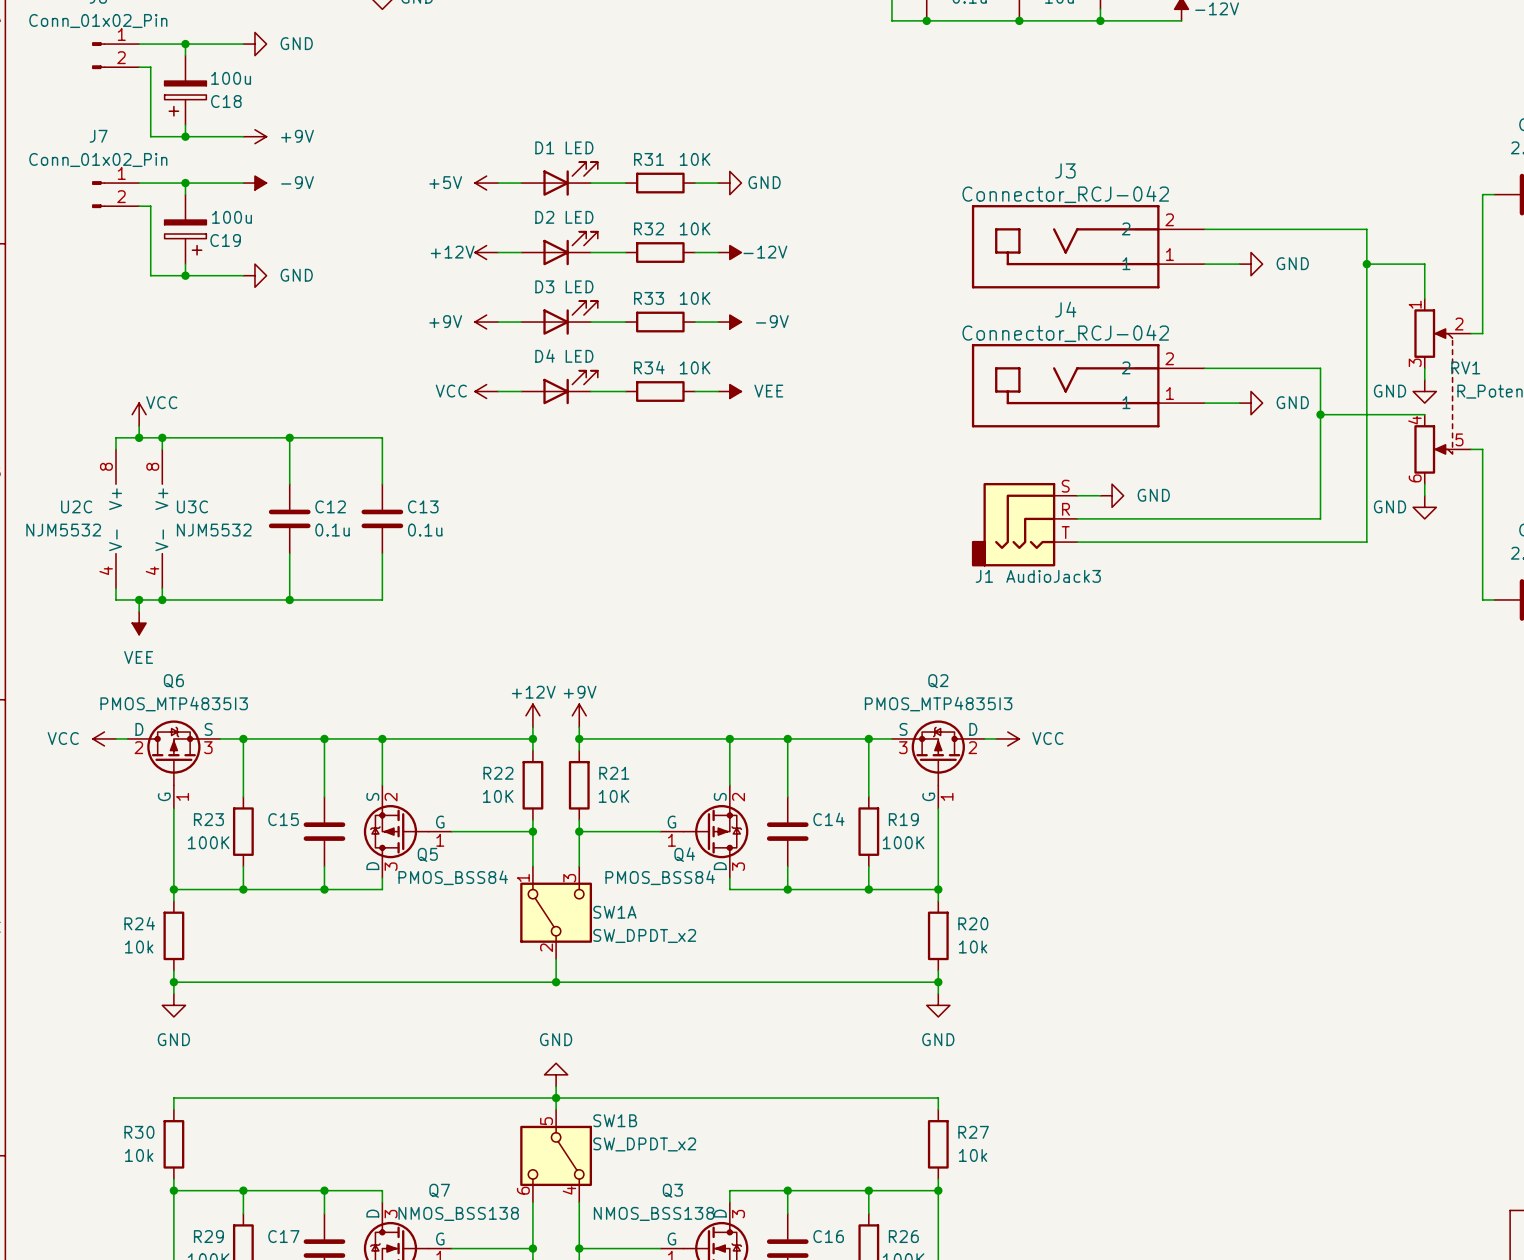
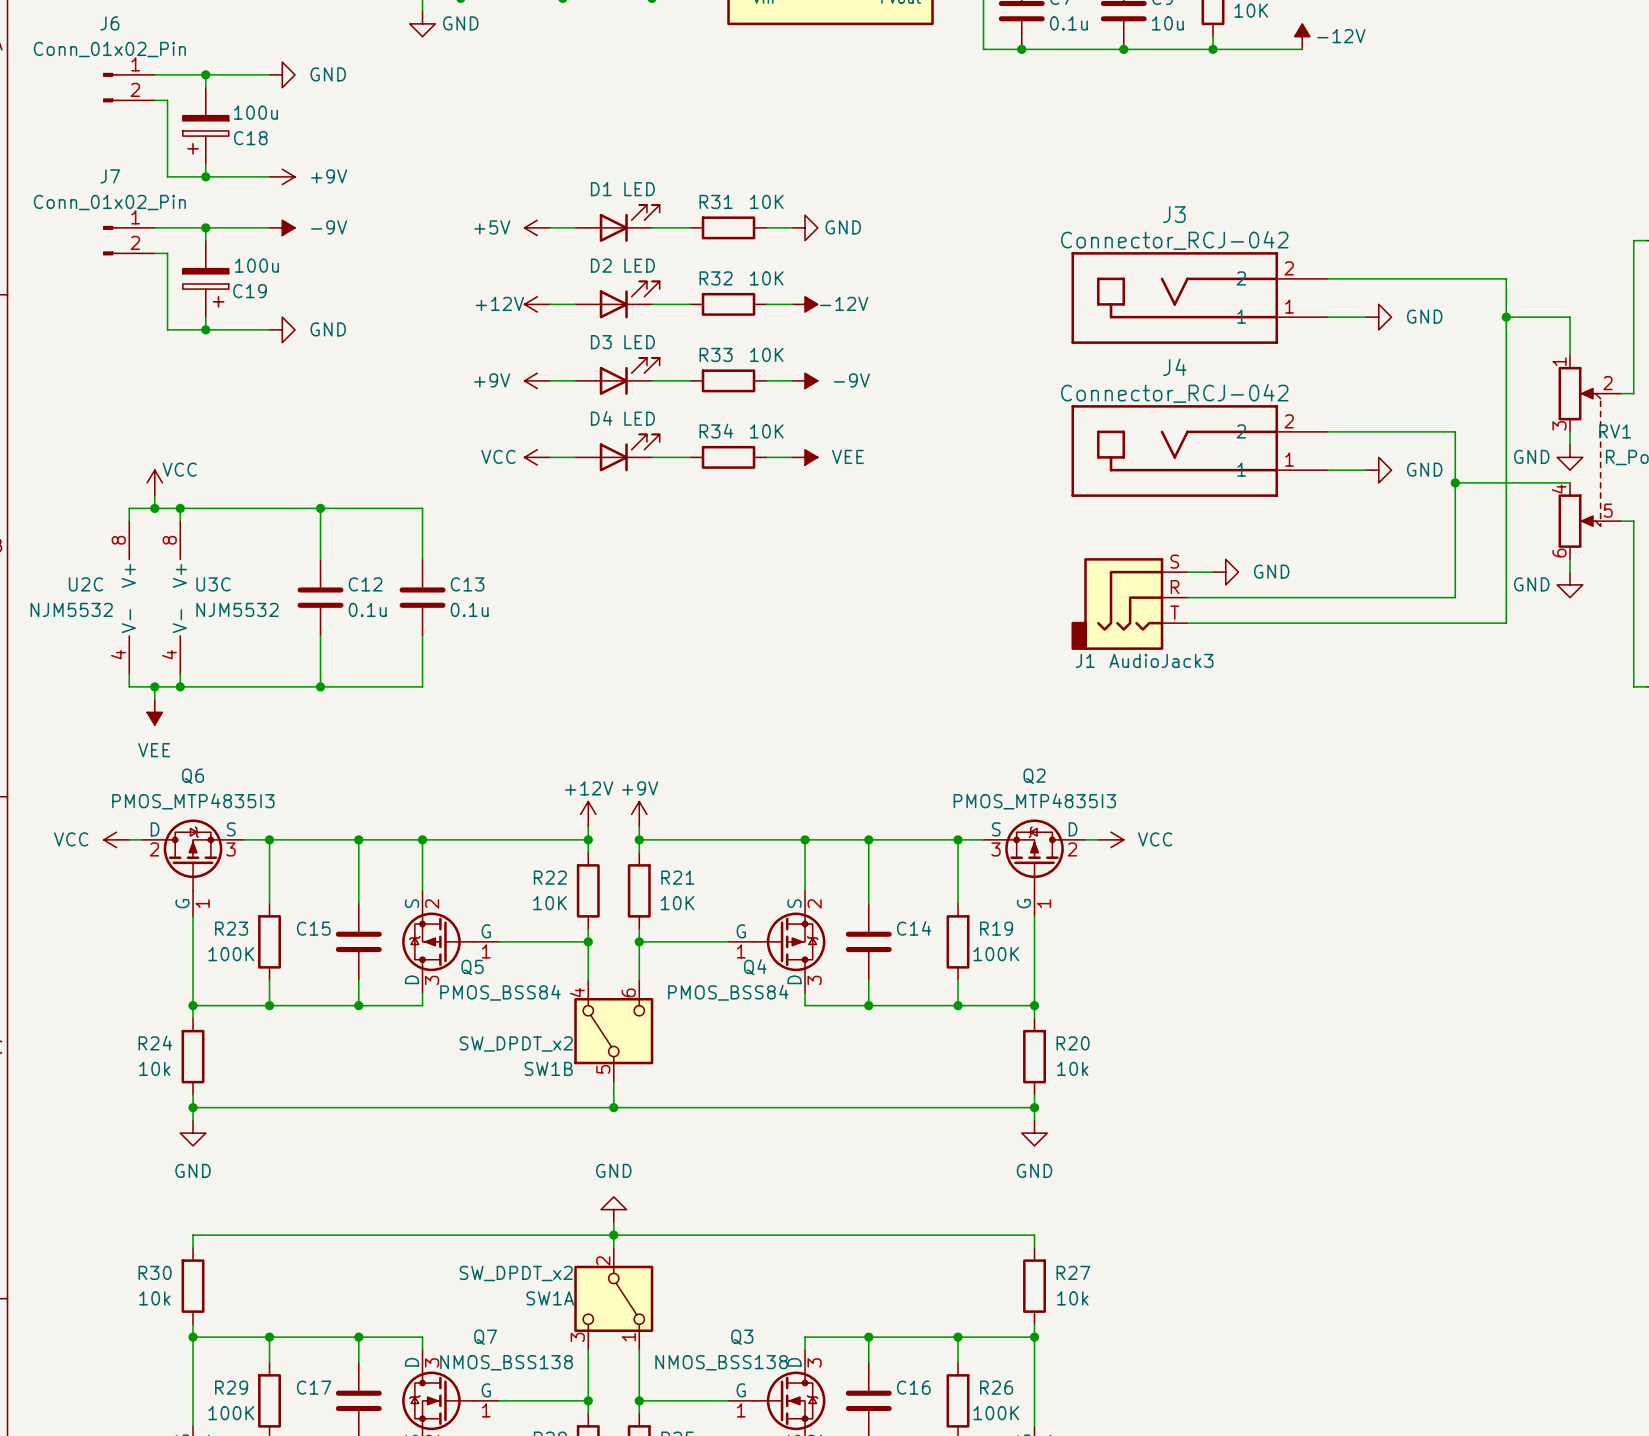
SW1A rotation: 0° (556, 912) -> 180° (613, 1298)
SW1A position: (556, 912) -> (613, 1298)
SW1B rotation: 0° (556, 1155) -> 180° (613, 1031)
SW1B position: (556, 1155) -> (613, 1031)

